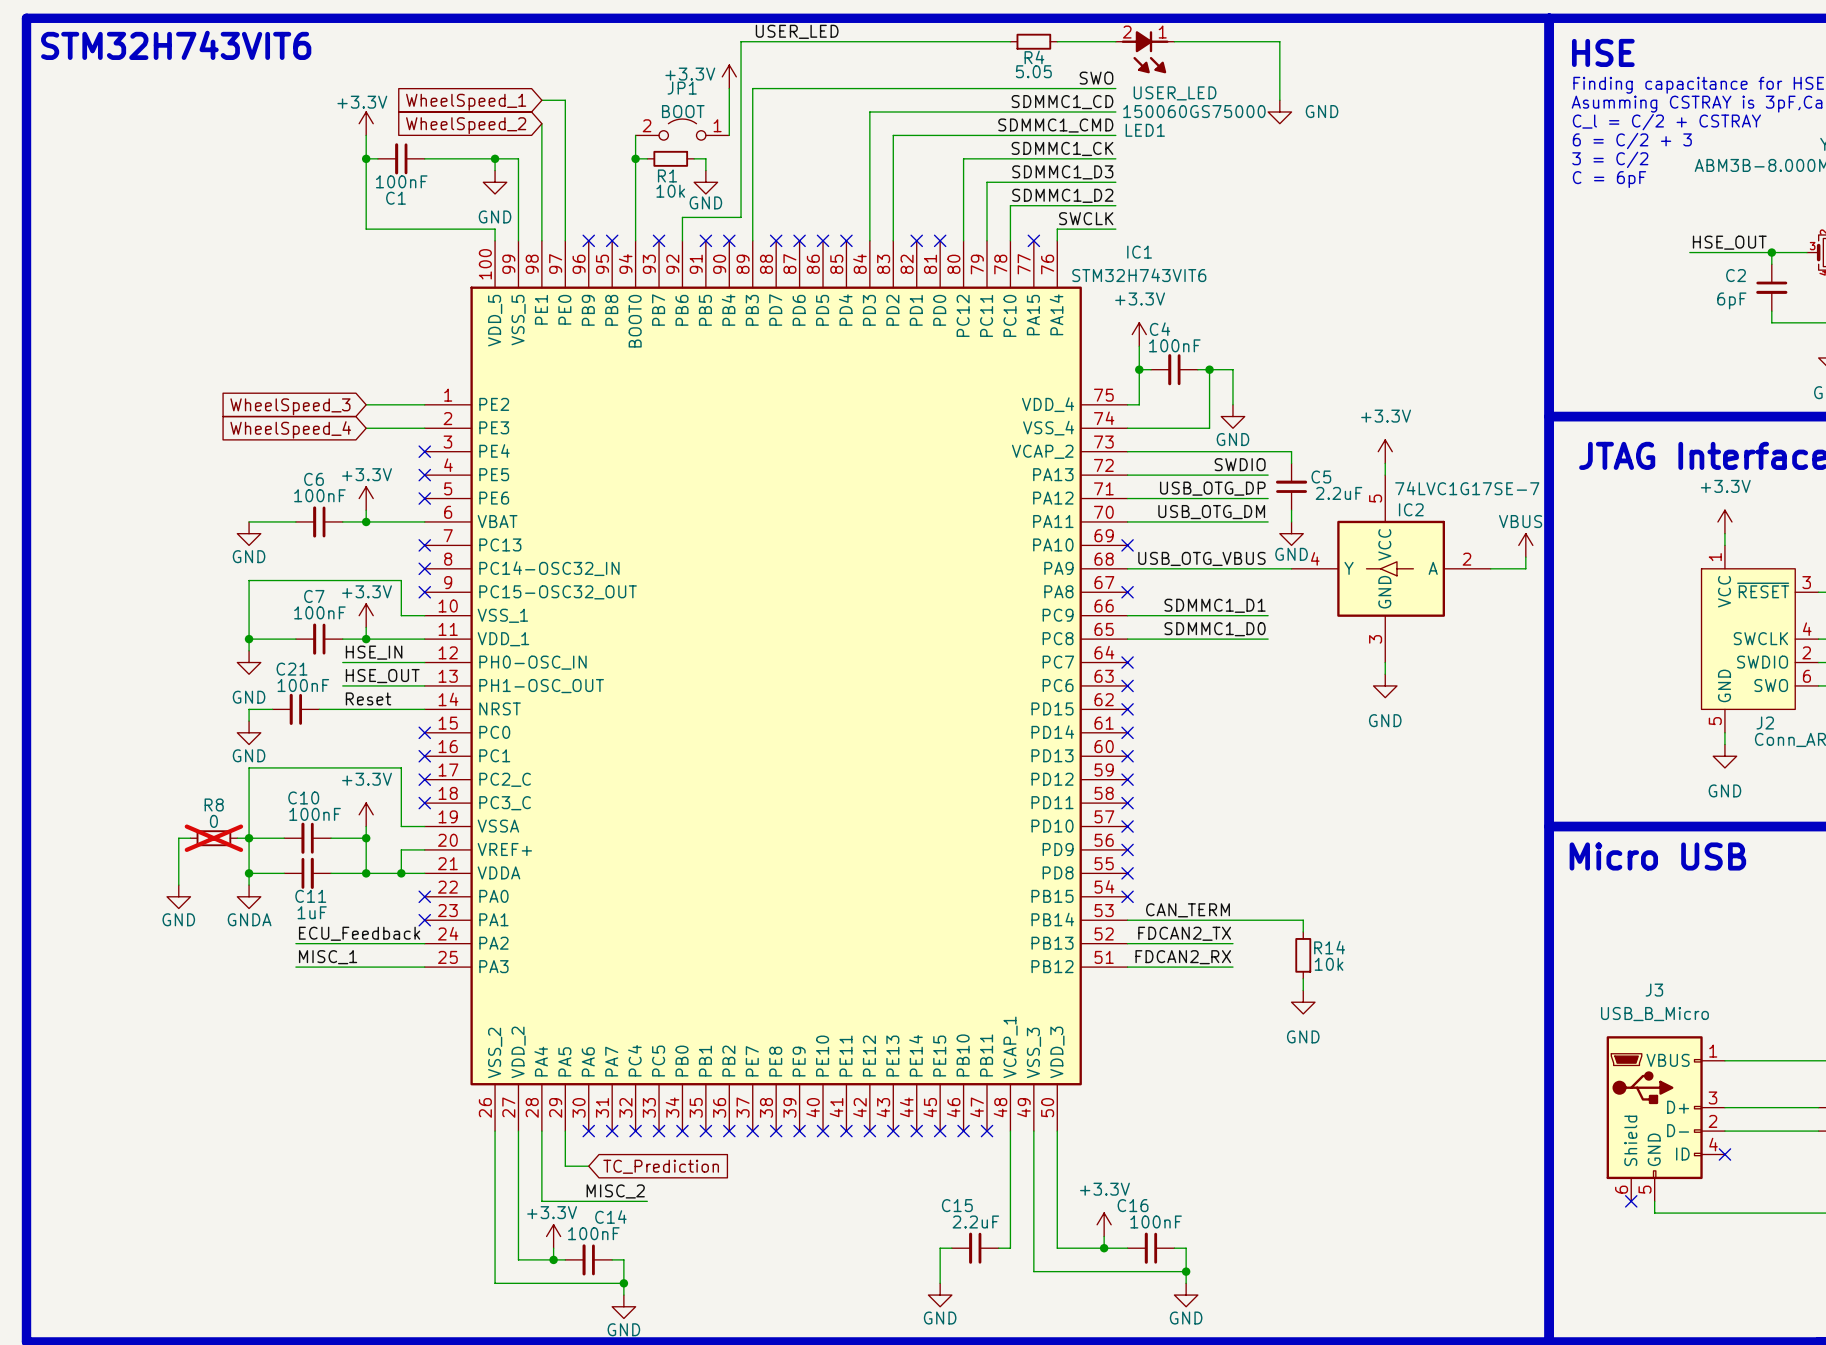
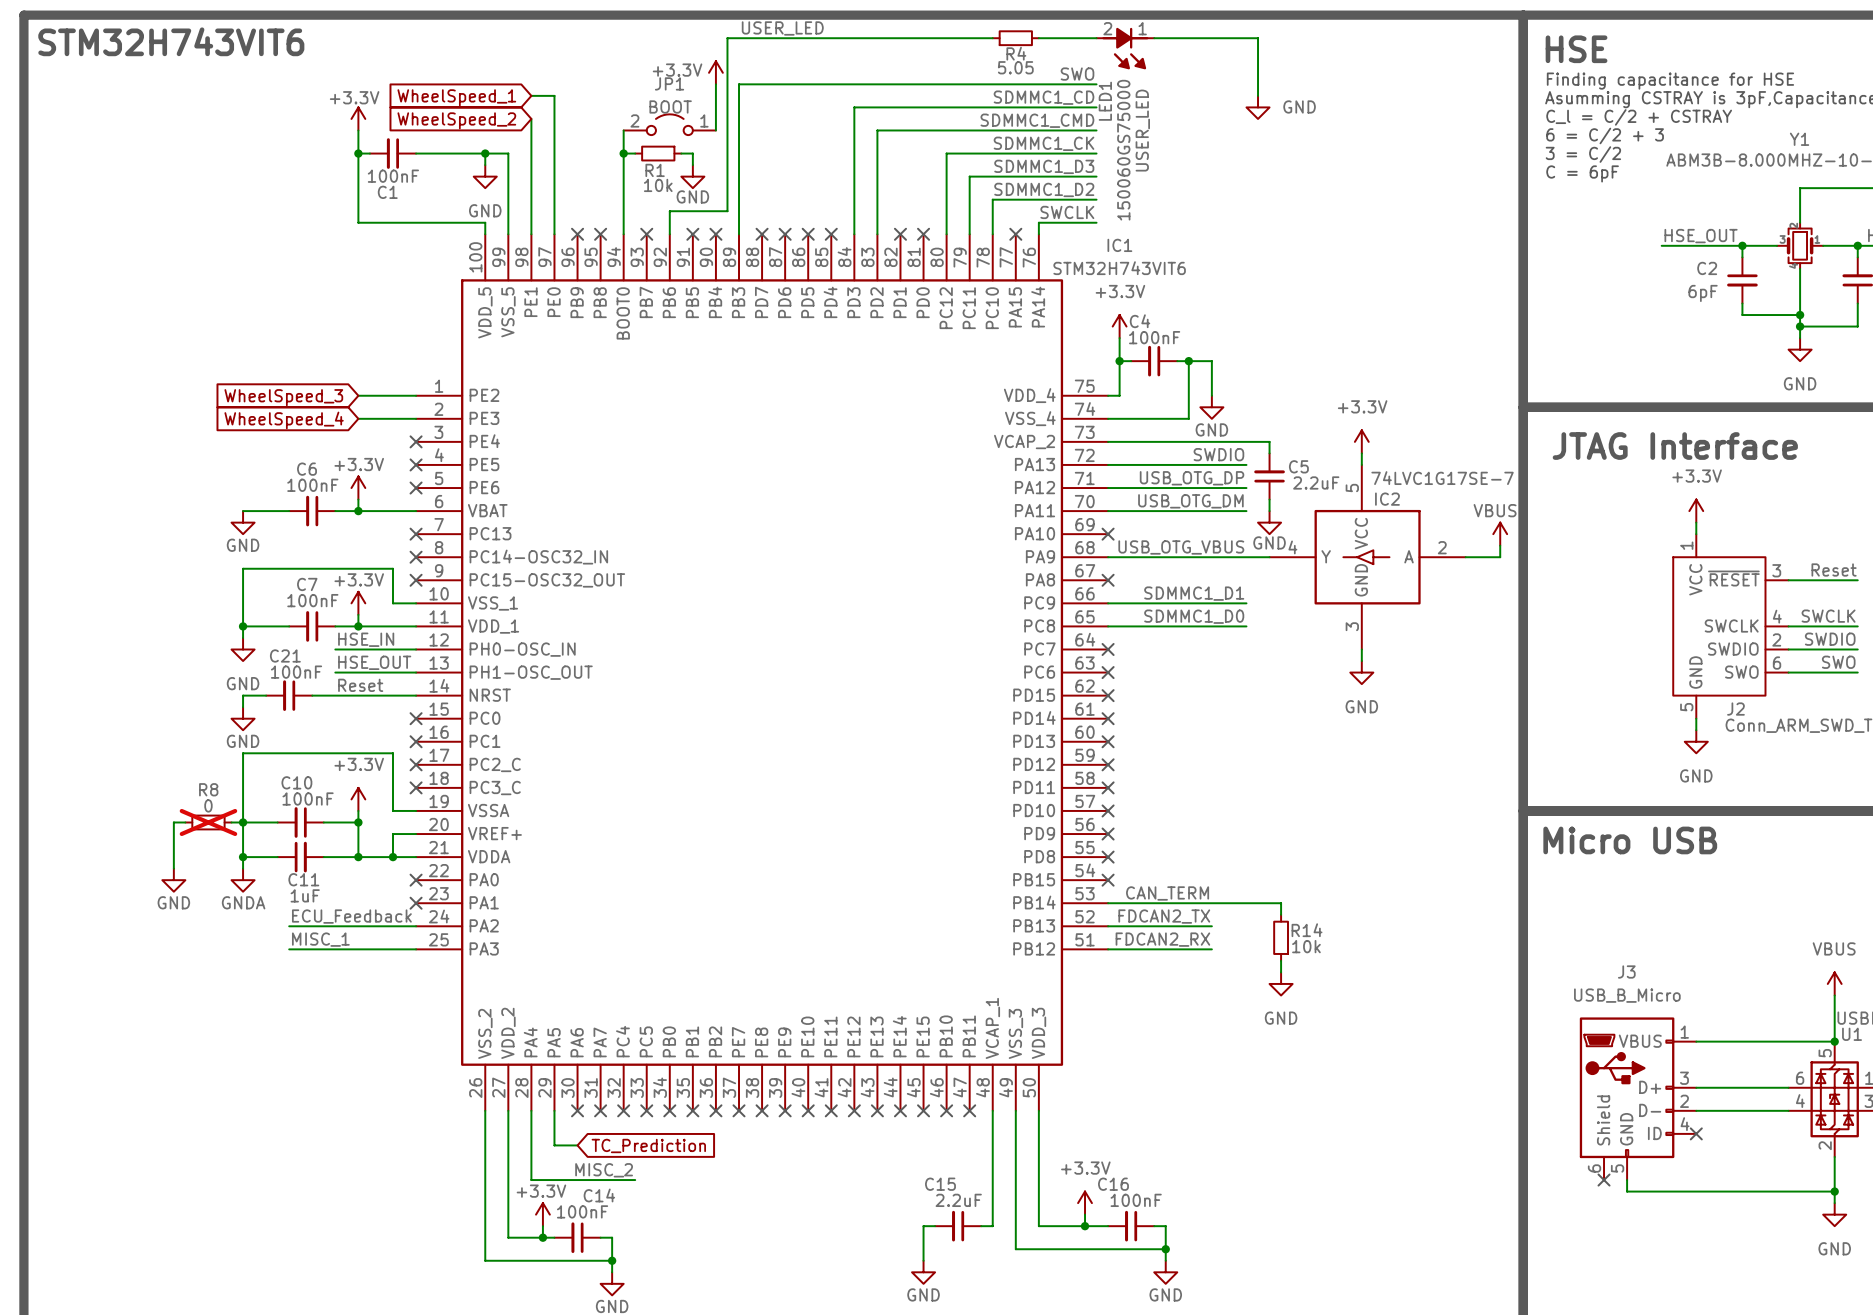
LED1 text rotation: 0° (1175, 93) -> 90° counterclockwise (1142, 130)
LED1 value rotation: 0° (1194, 111) -> 90° counterclockwise (1123, 150)
LED1 name rotation: 0° (1145, 130) -> 90° counterclockwise (1105, 101)

